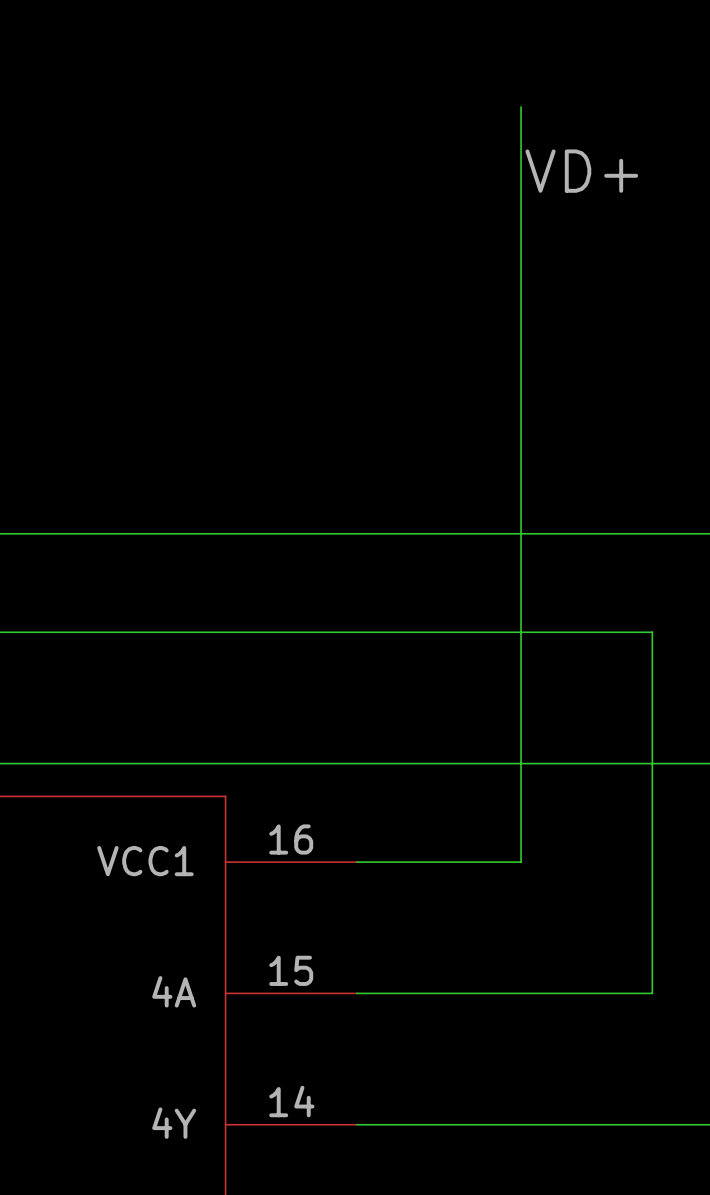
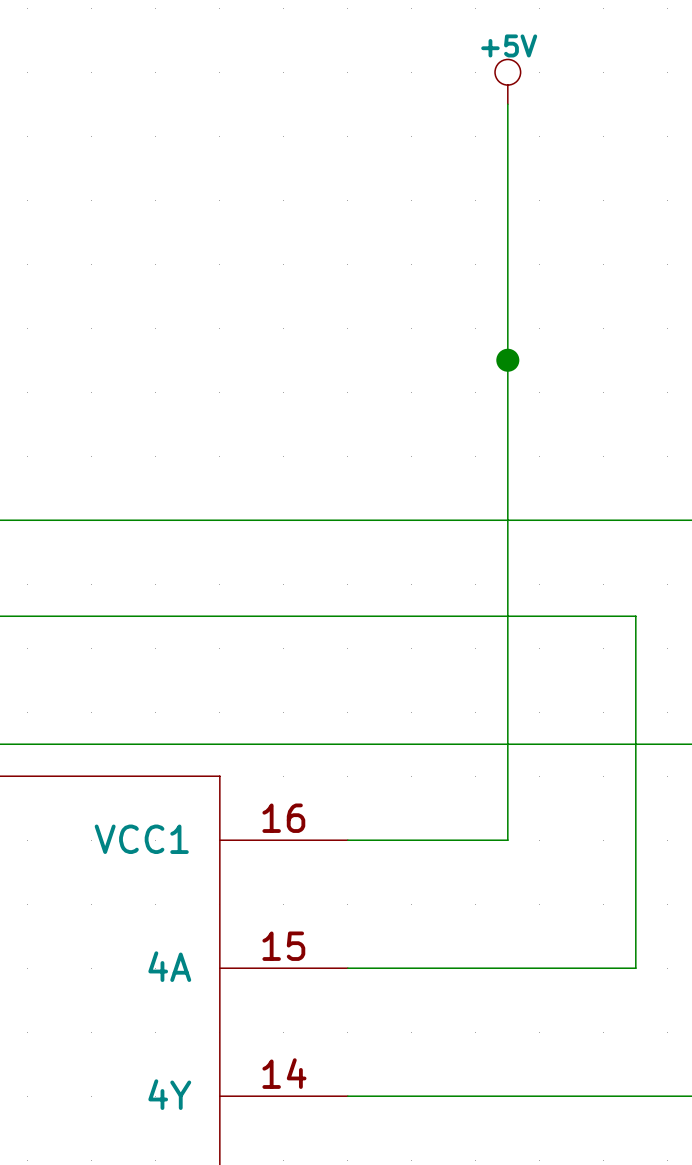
power symbol: none -> +5V (507, 81)
label: VD+ (581, 171) -> none
junction: none -> (507, 360)

